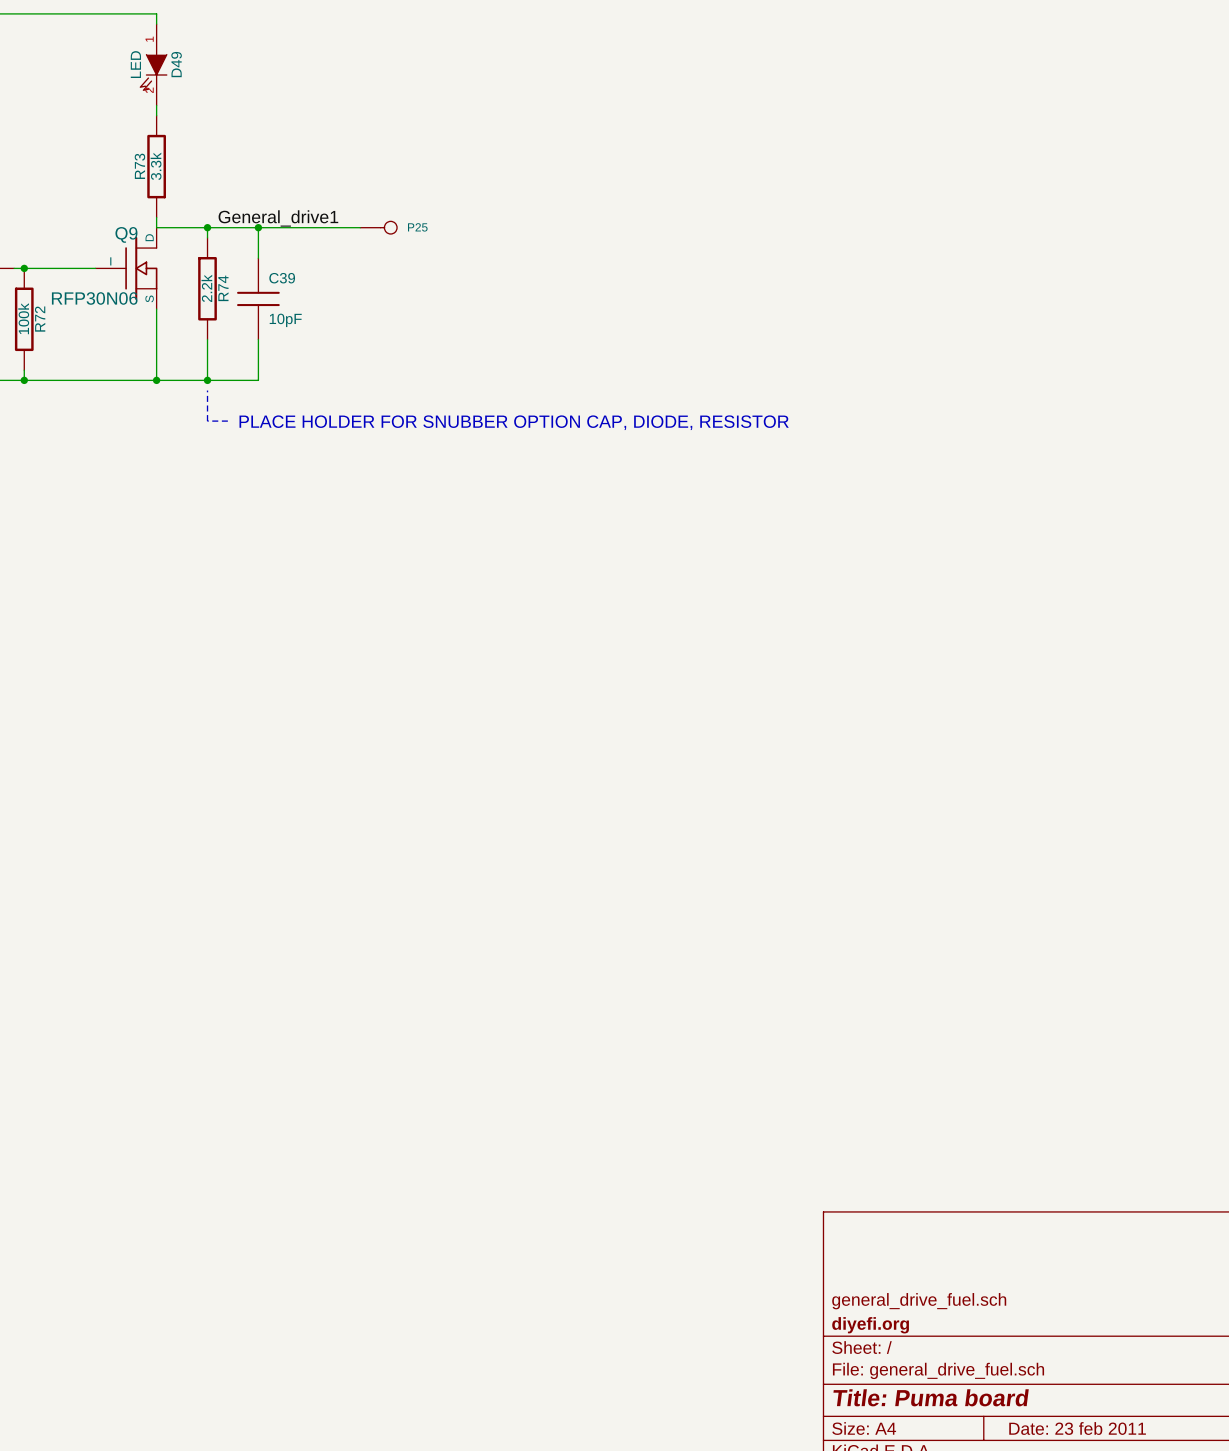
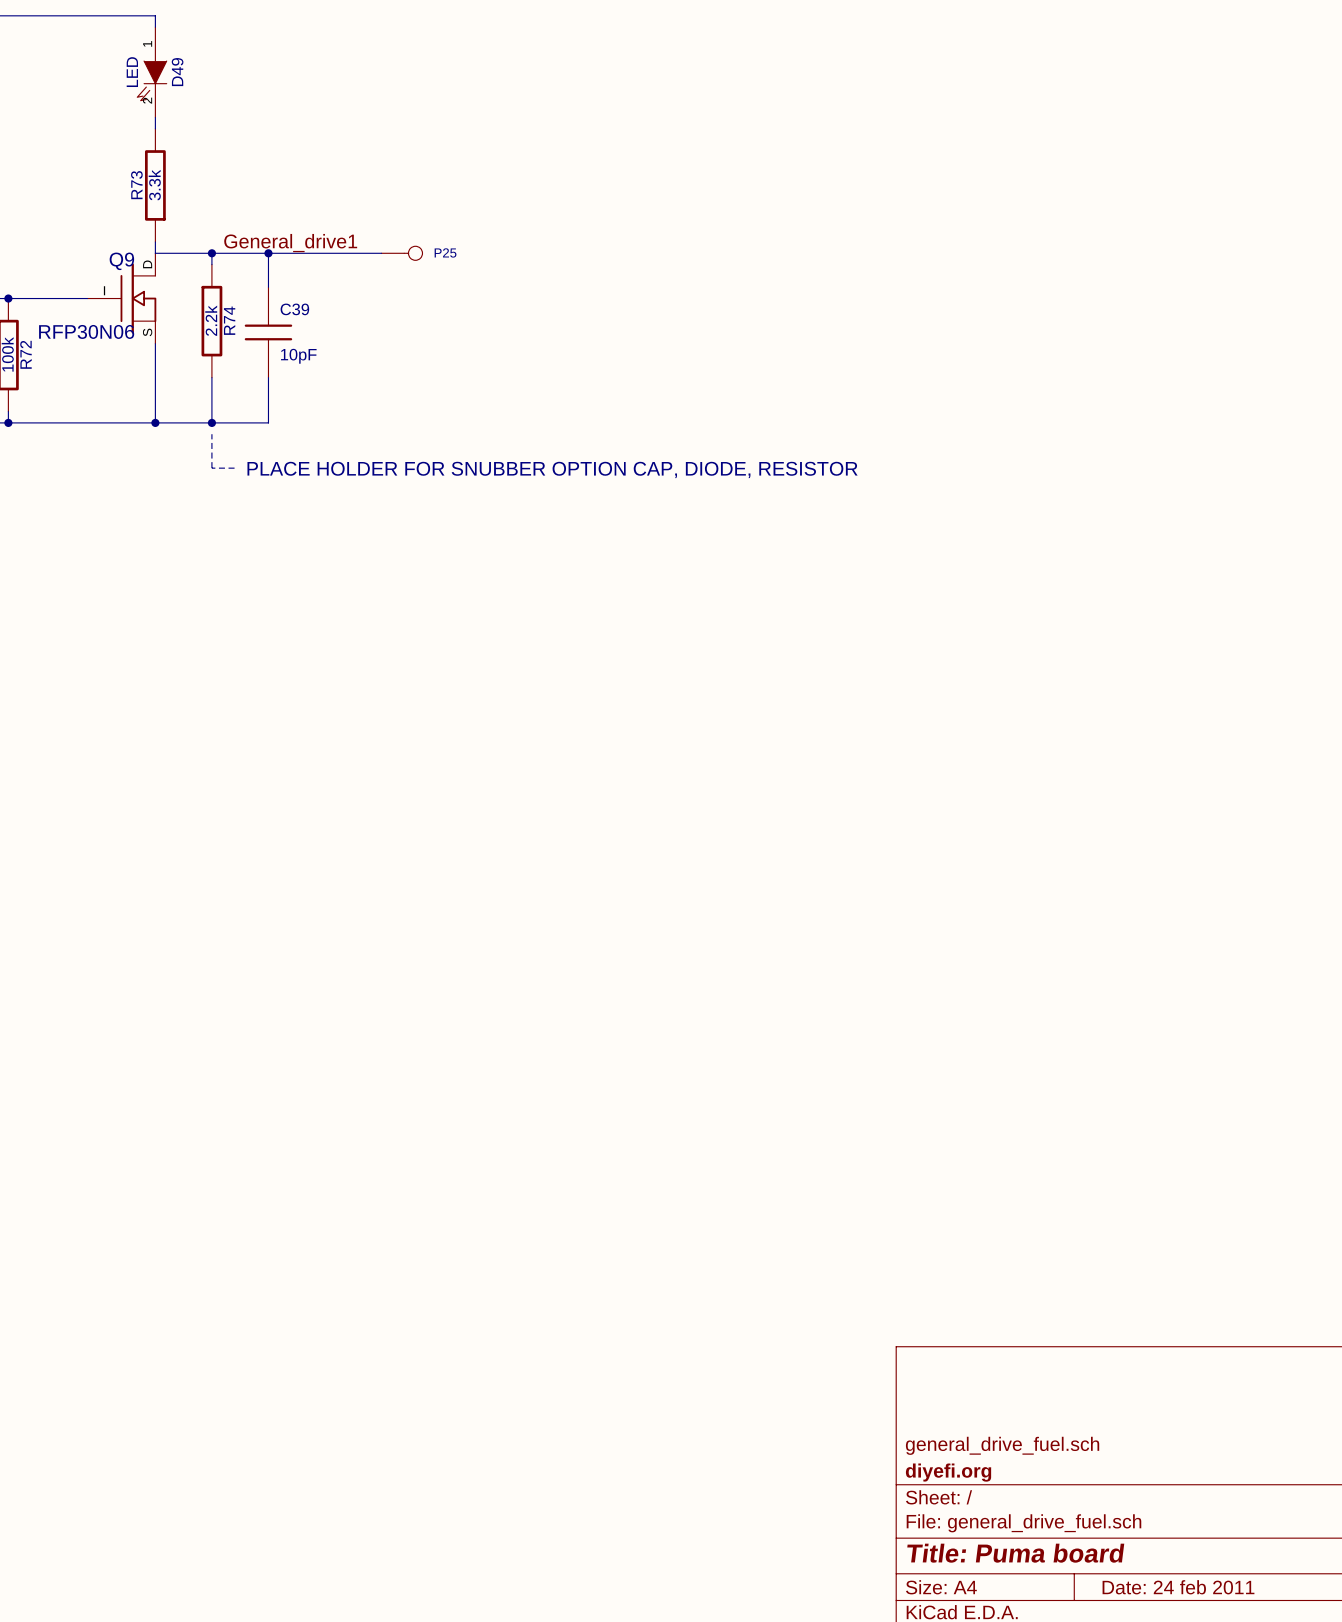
title block: Date: 23 feb 2011 (1077, 1428) -> Date: 24 feb 2011 (1178, 1587)

